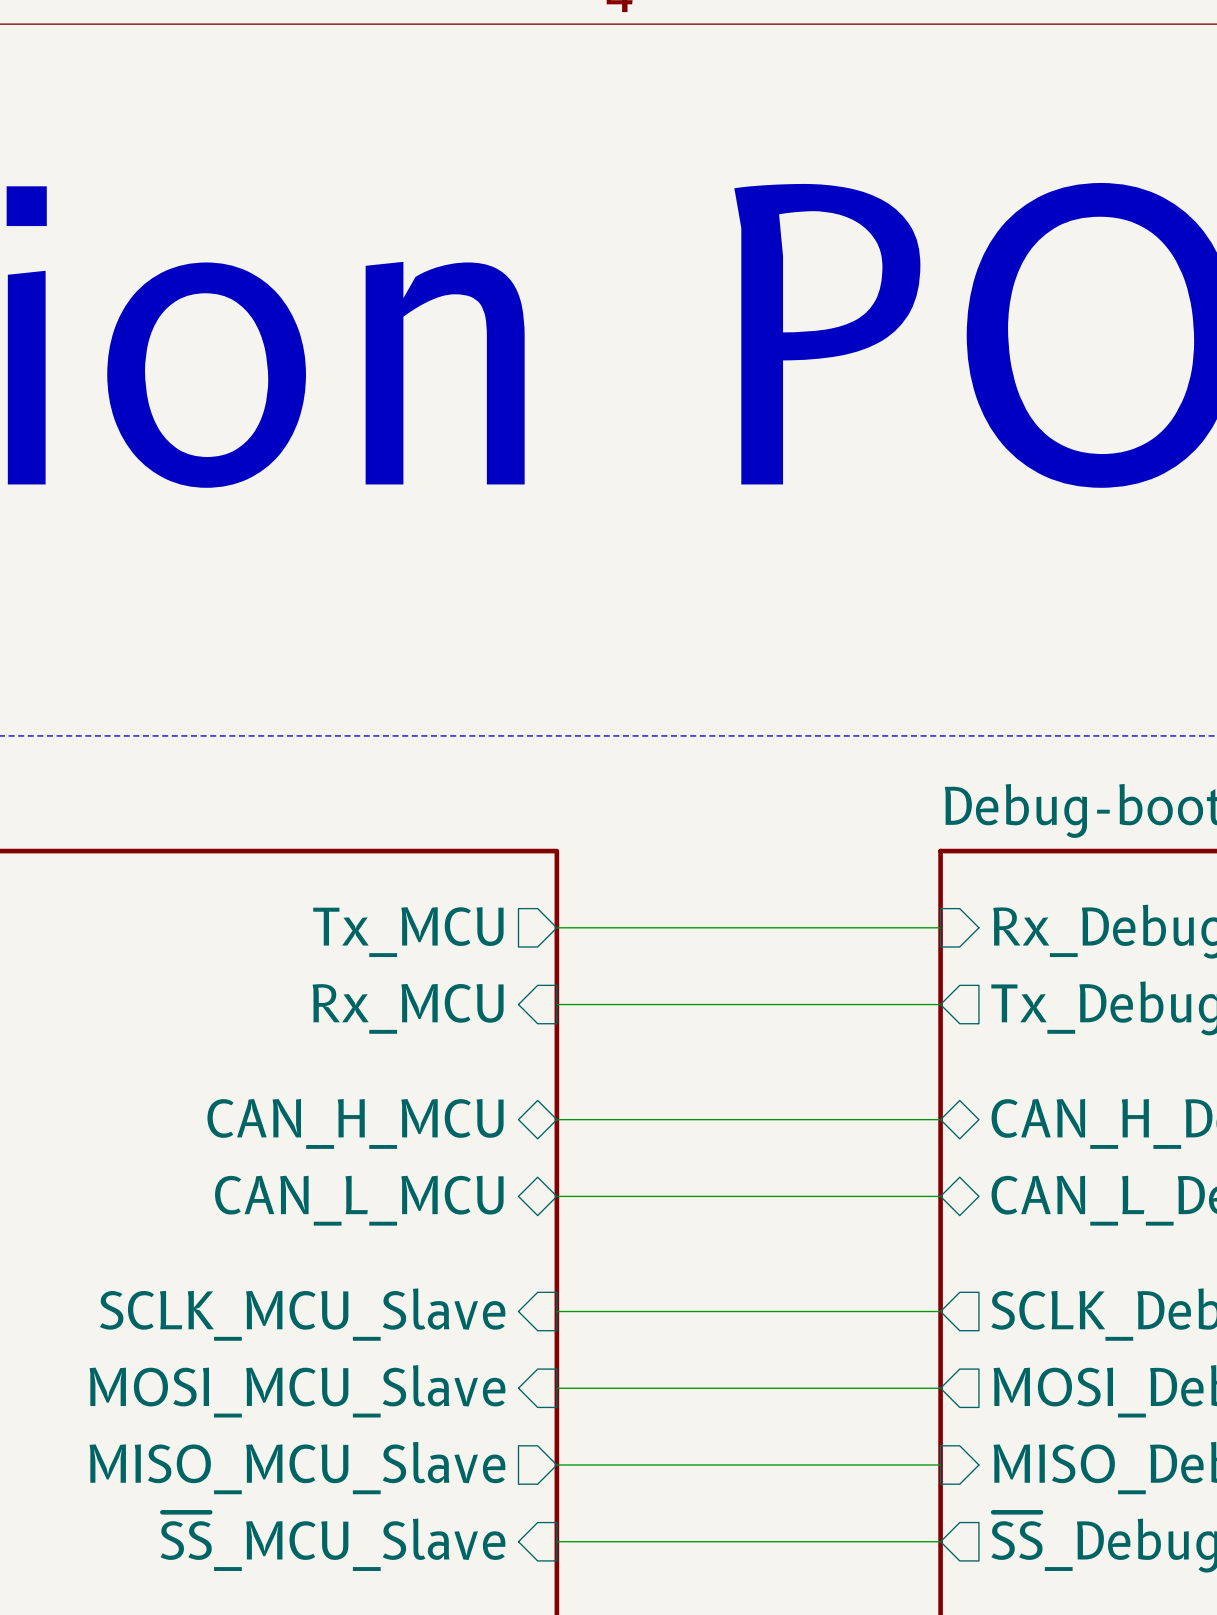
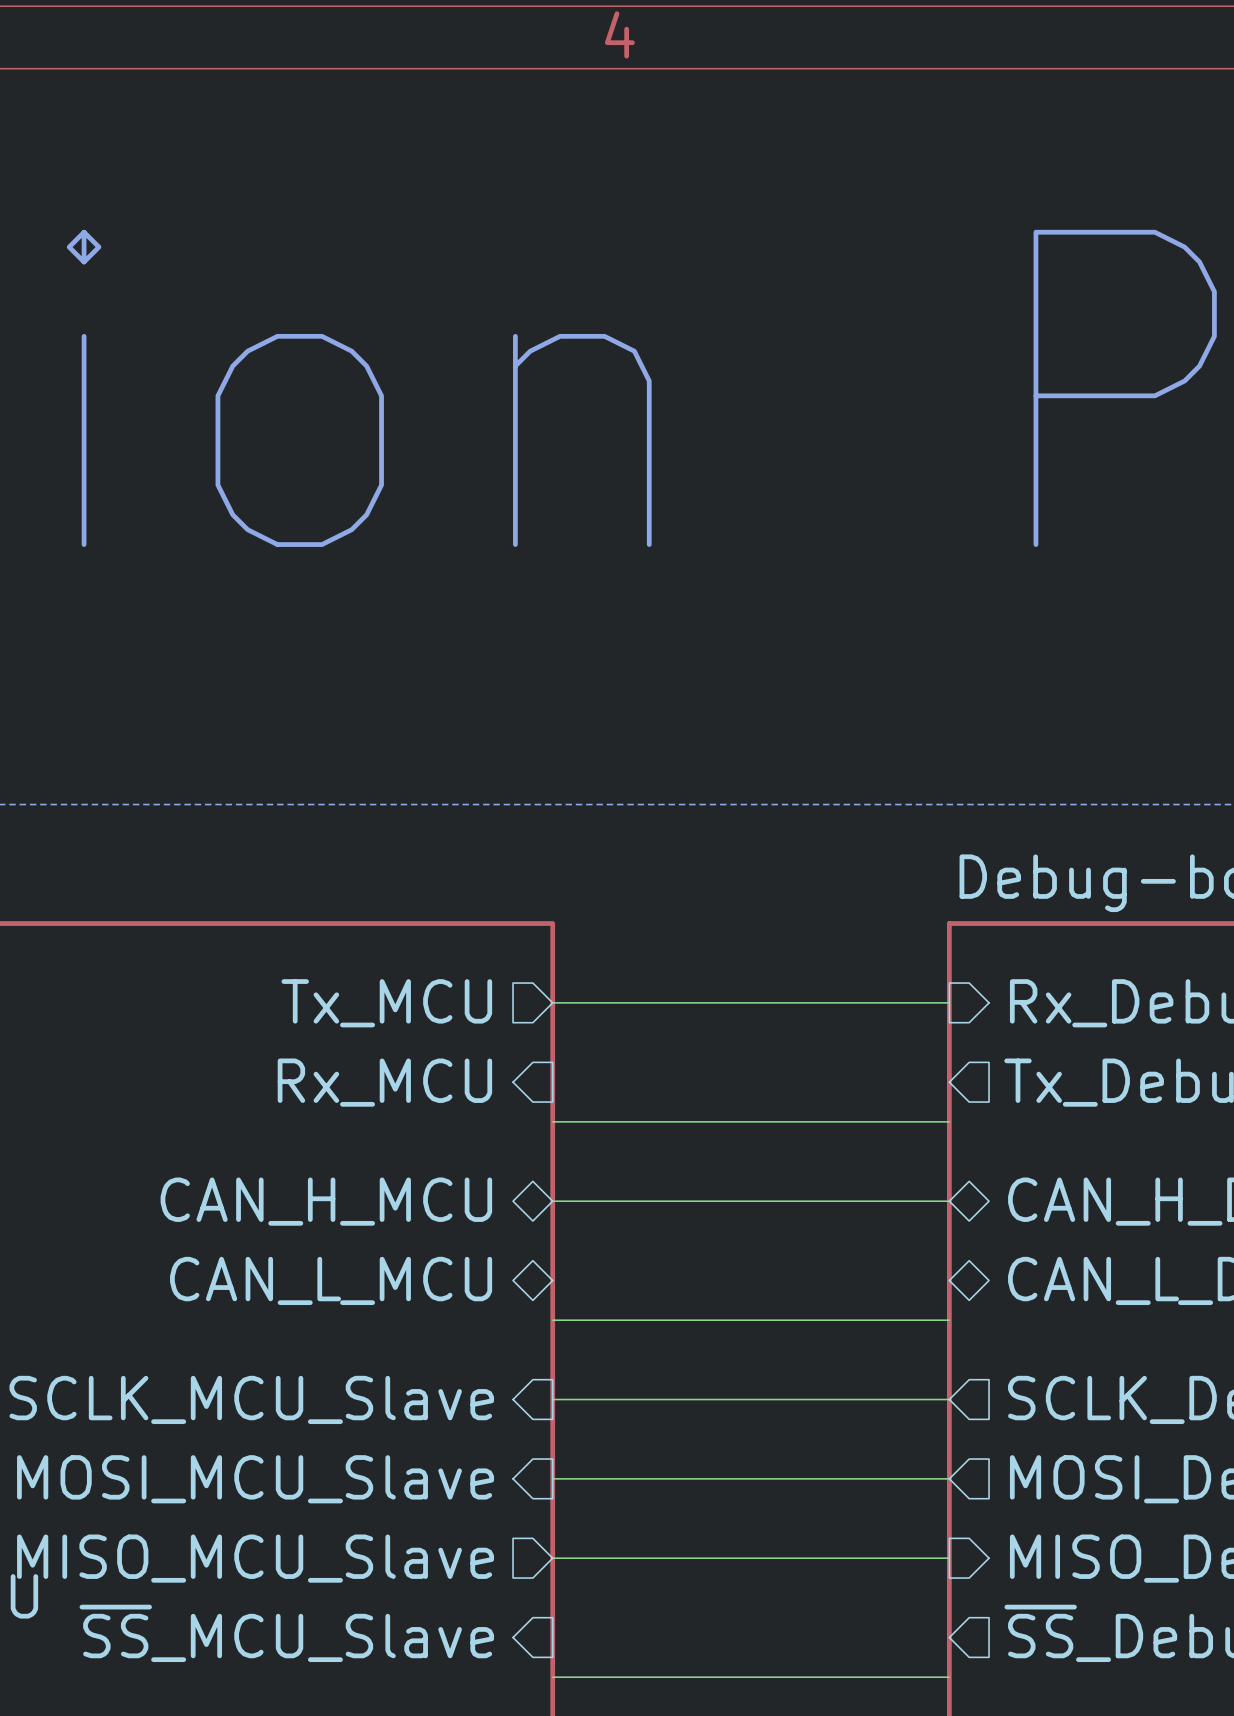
wire: (556, 1004) (940, 1004) -> (552, 1121) (949, 1121)
wire: (556, 1196) (940, 1196) -> (552, 1320) (949, 1320)
wire: (556, 1541) (940, 1541) -> (552, 1677) (949, 1677)

